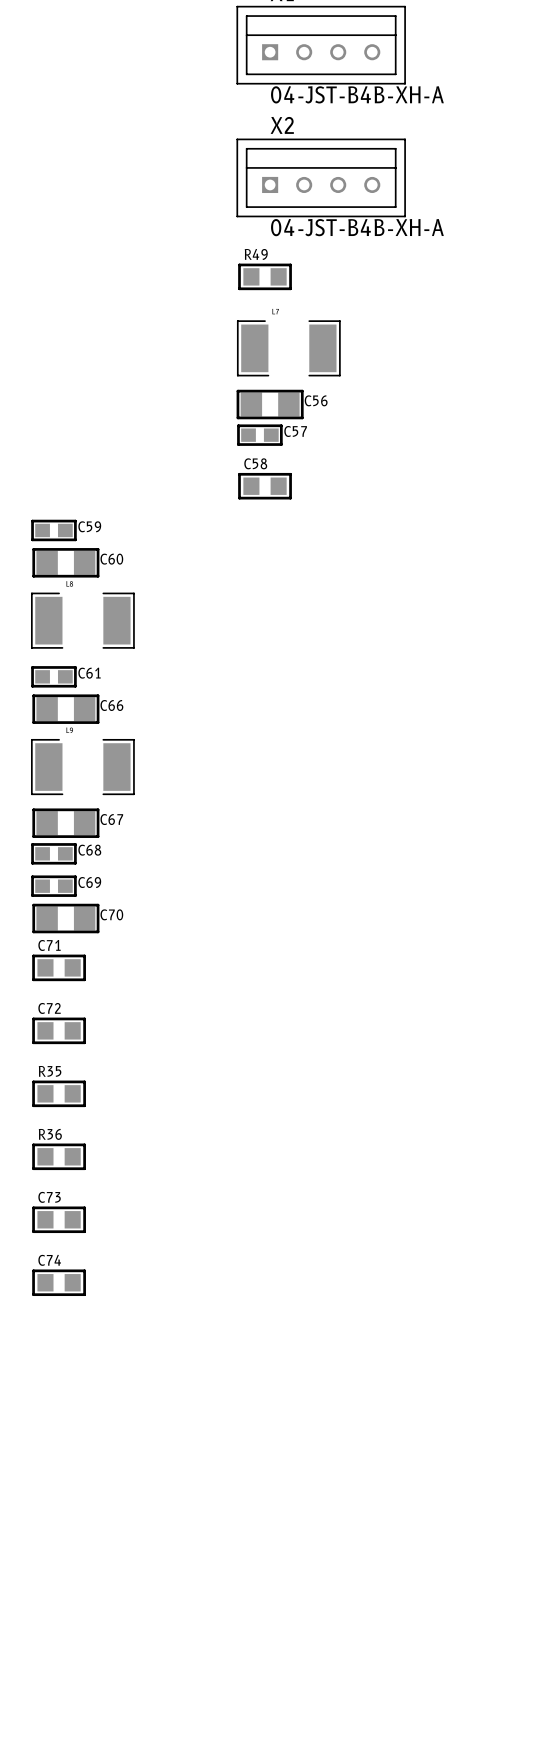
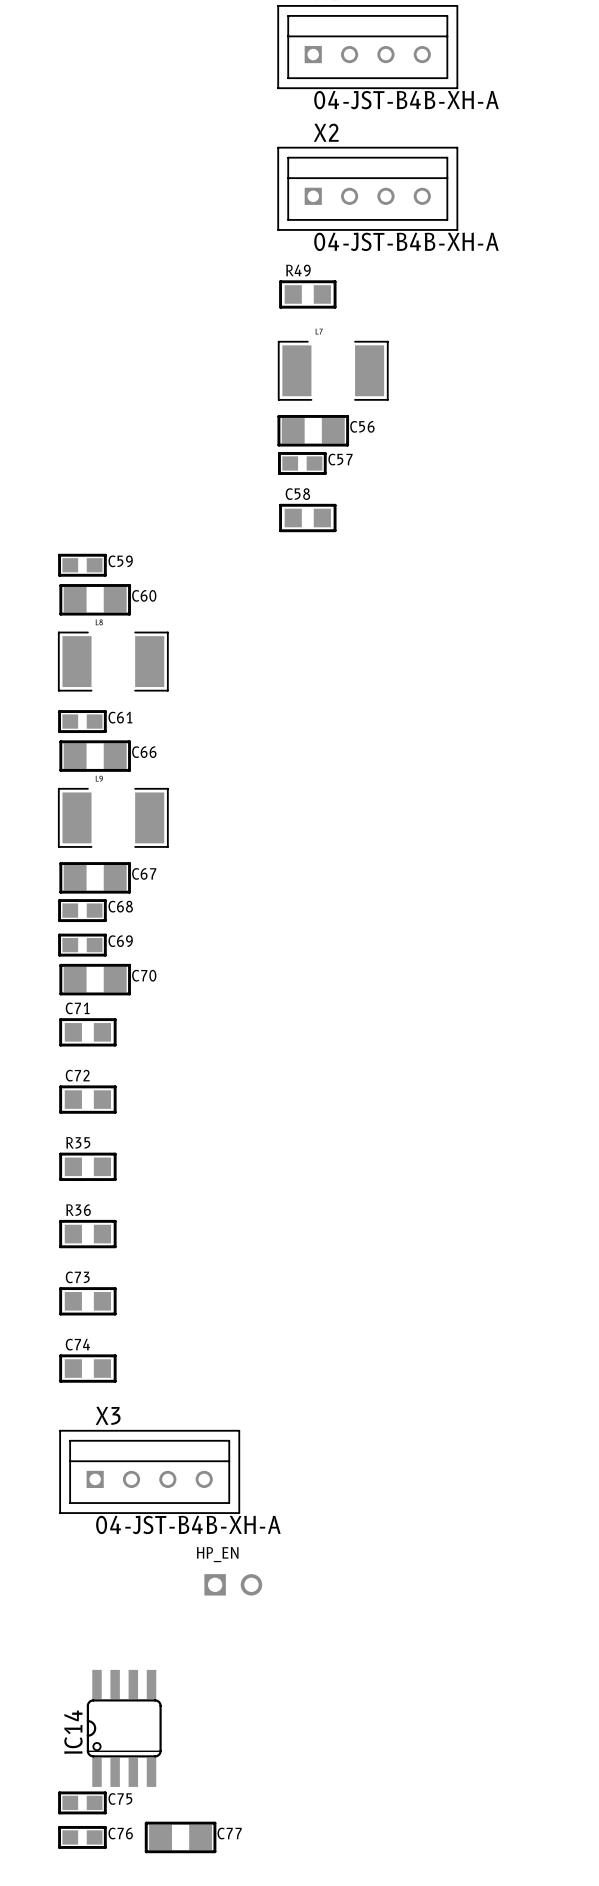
X3: none -> 04-JST-B4B-XH-A (149, 1471)
HP_EN: none -> (233, 1584)
IC14: none -> (124, 1728)
C75: none -> (82, 1802)
C76: none -> (82, 1837)
C77: none -> (180, 1837)

